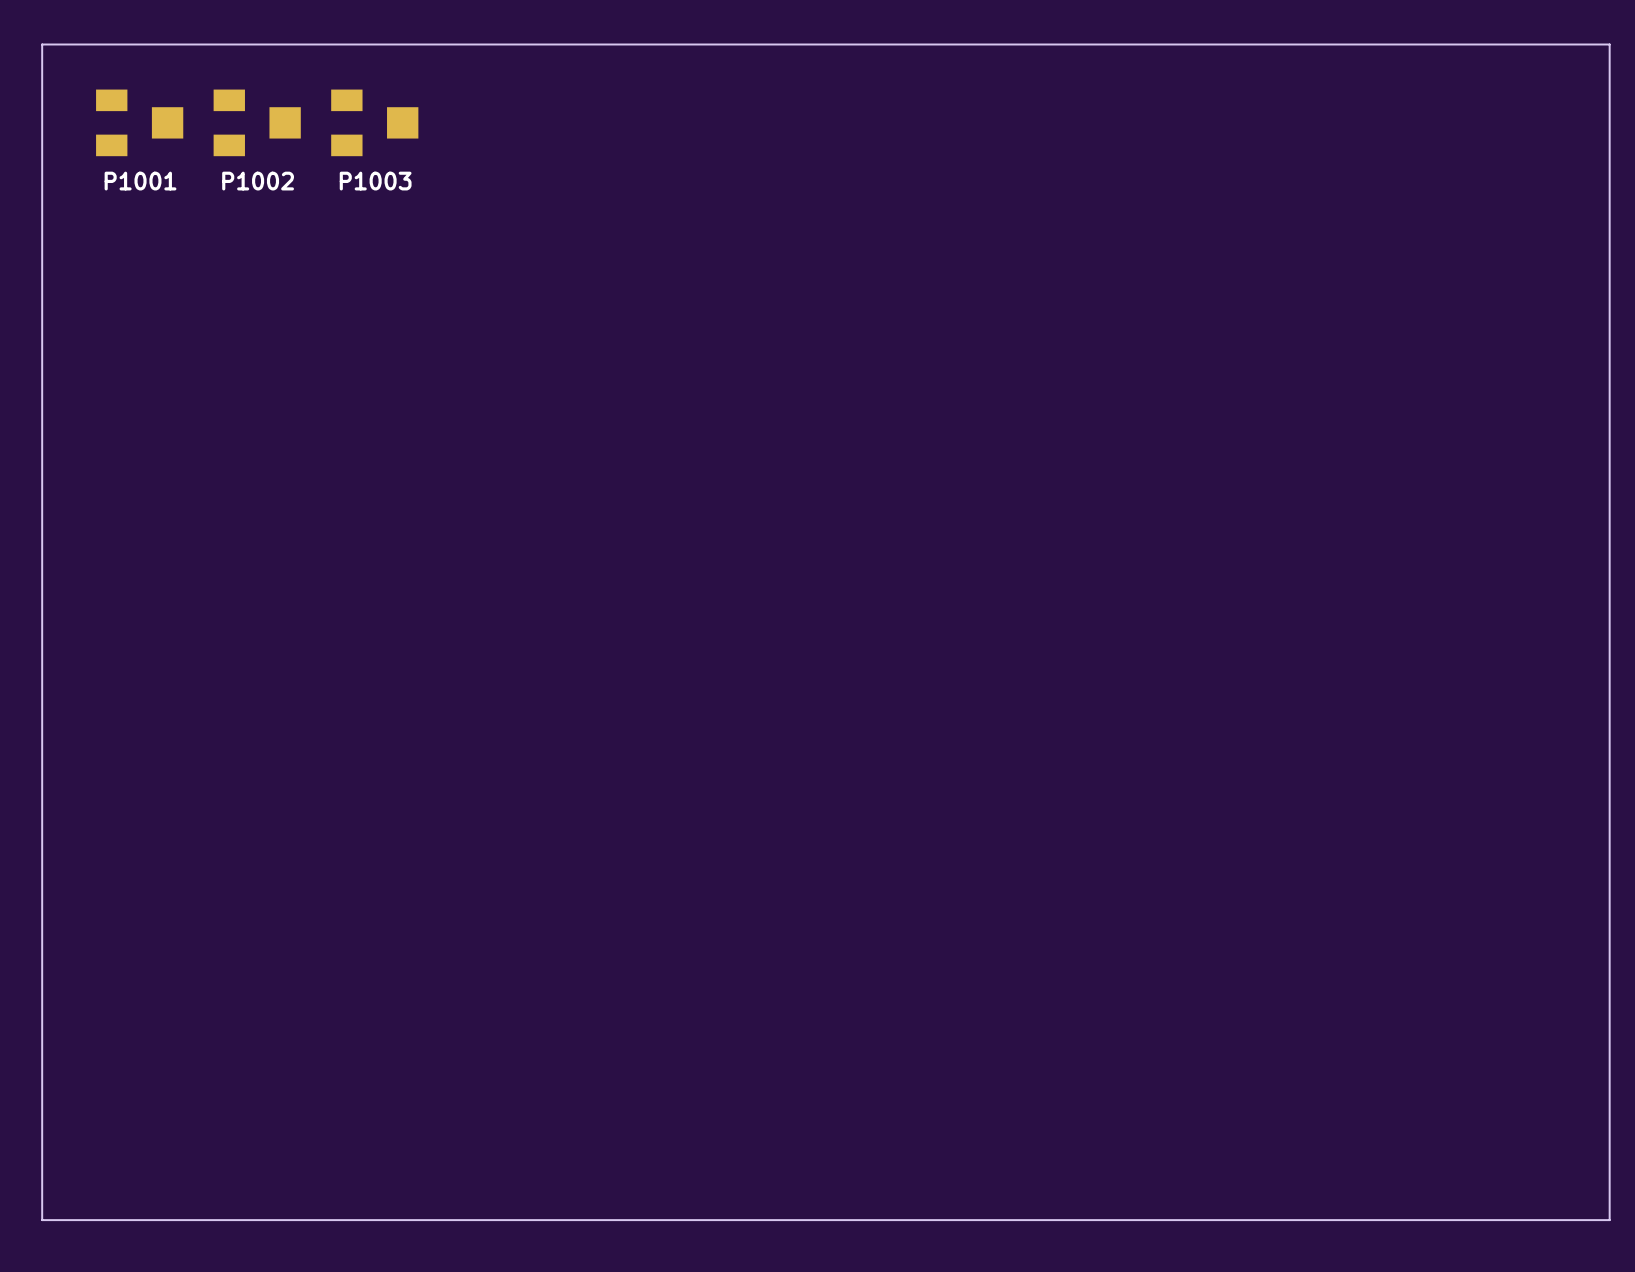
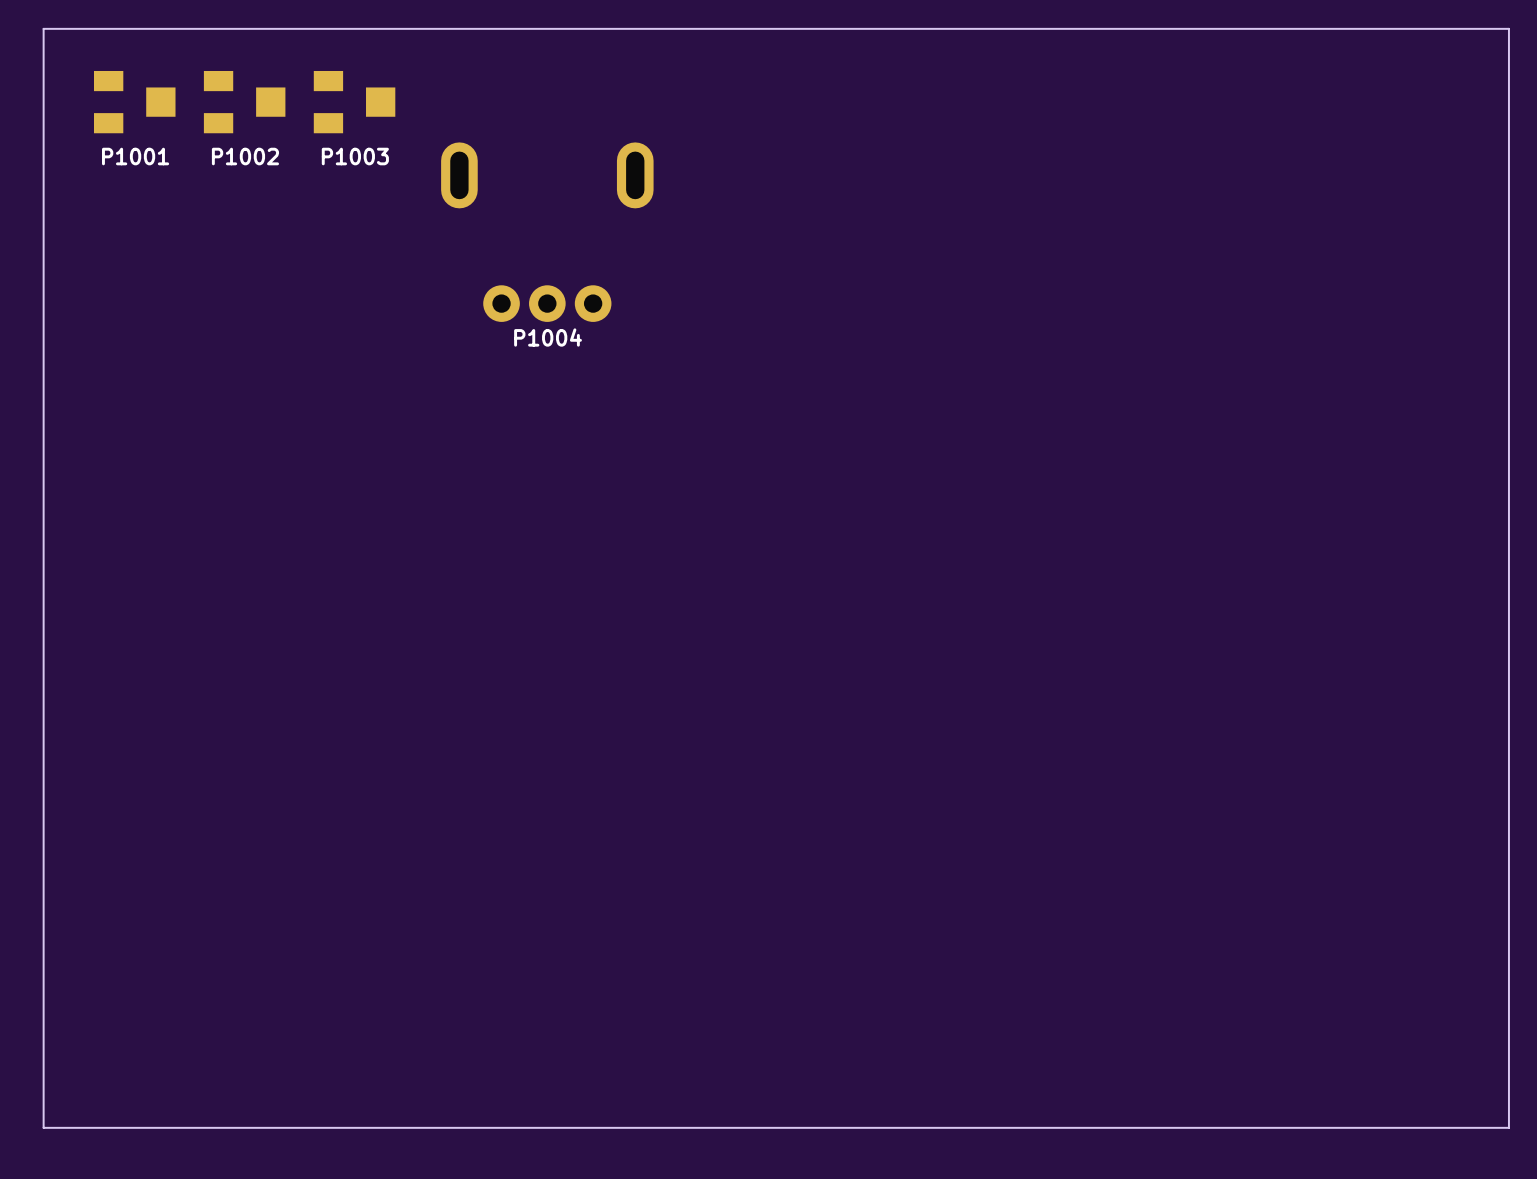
P1004: none -> (547, 232)

